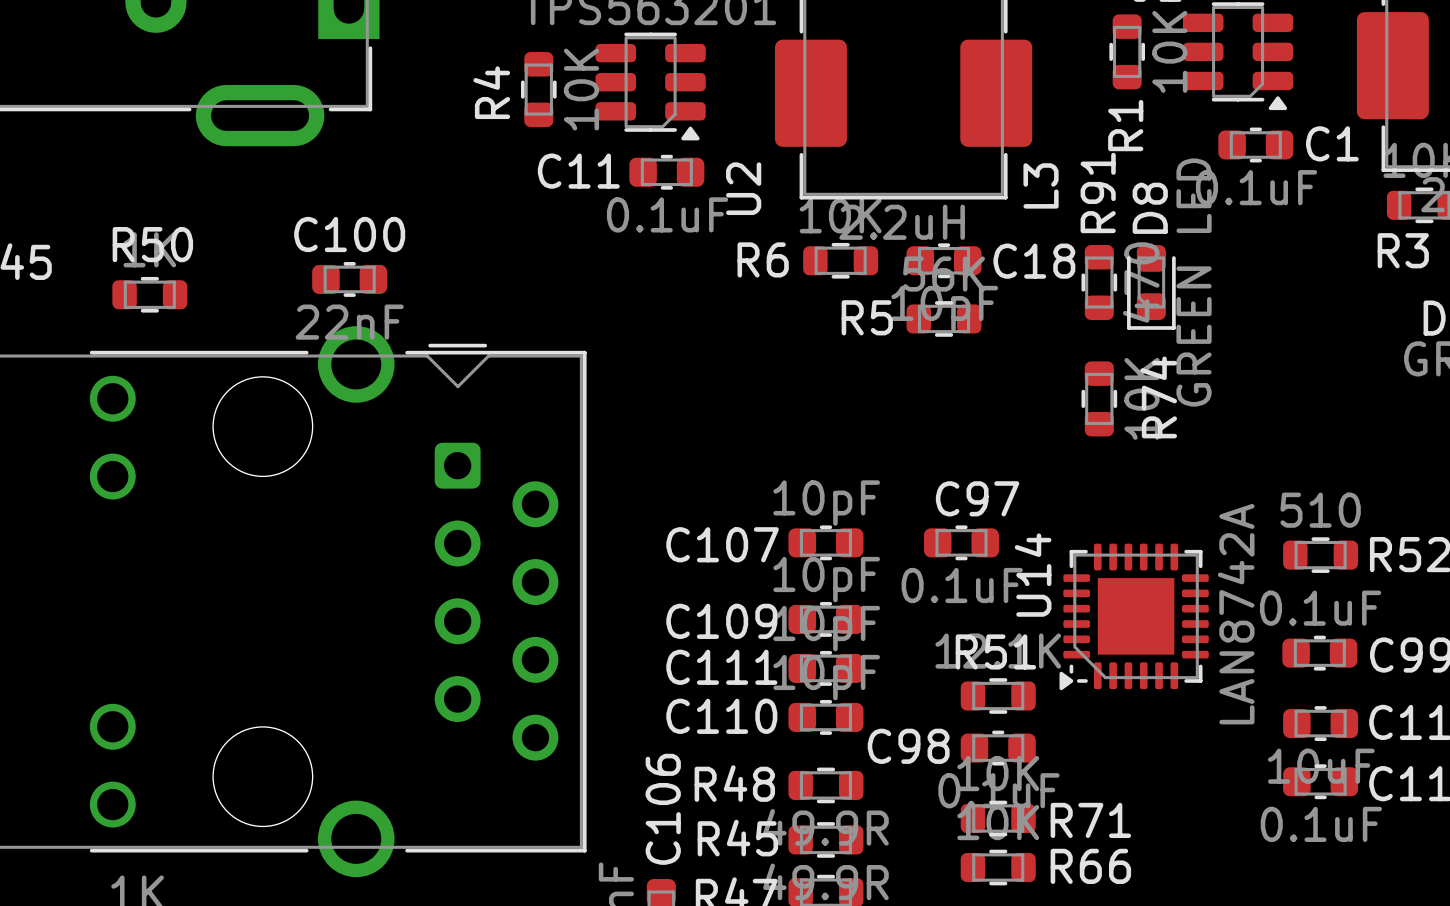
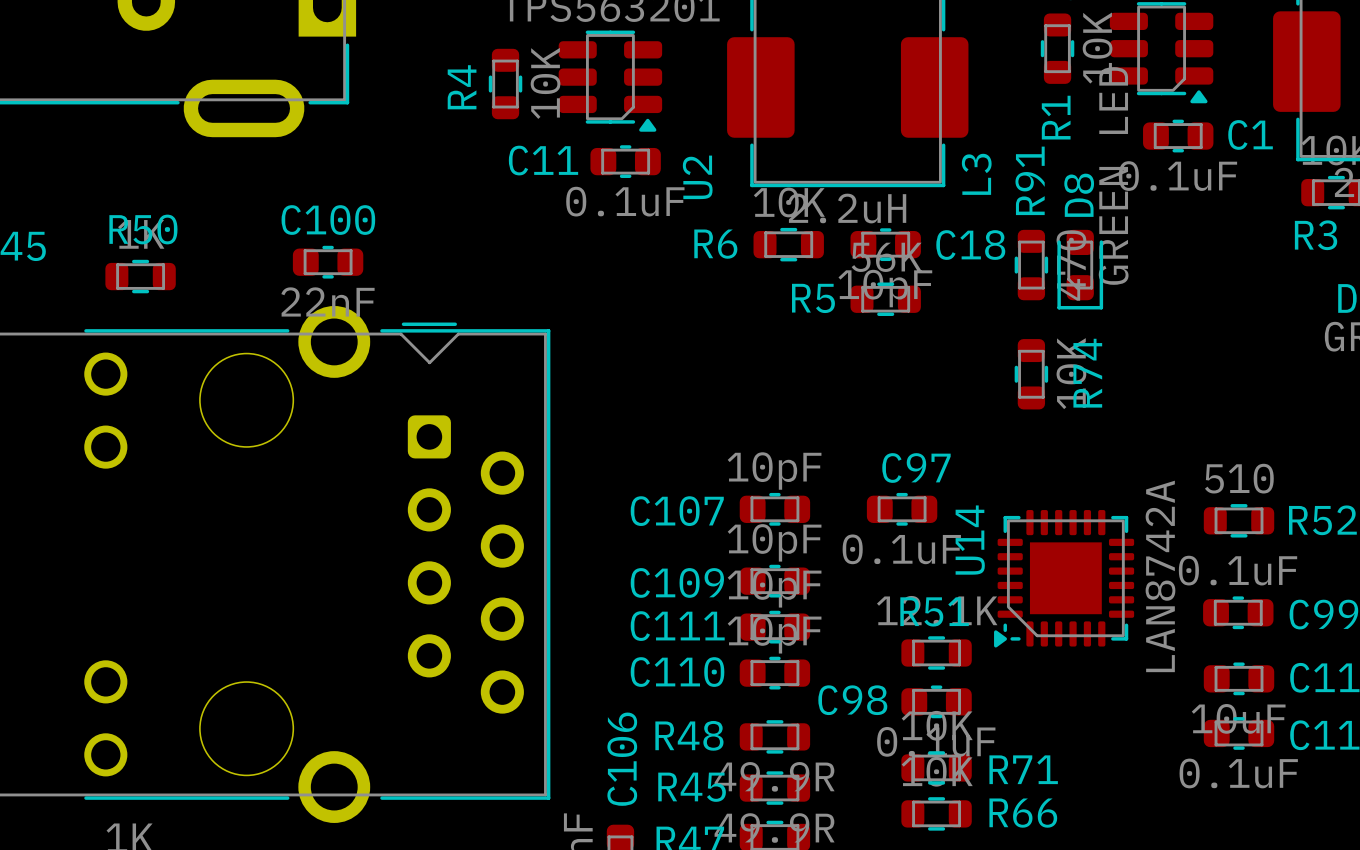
D8 value position: GREEN LED (1194, 282) -> GREEN LED (1113, 175)

